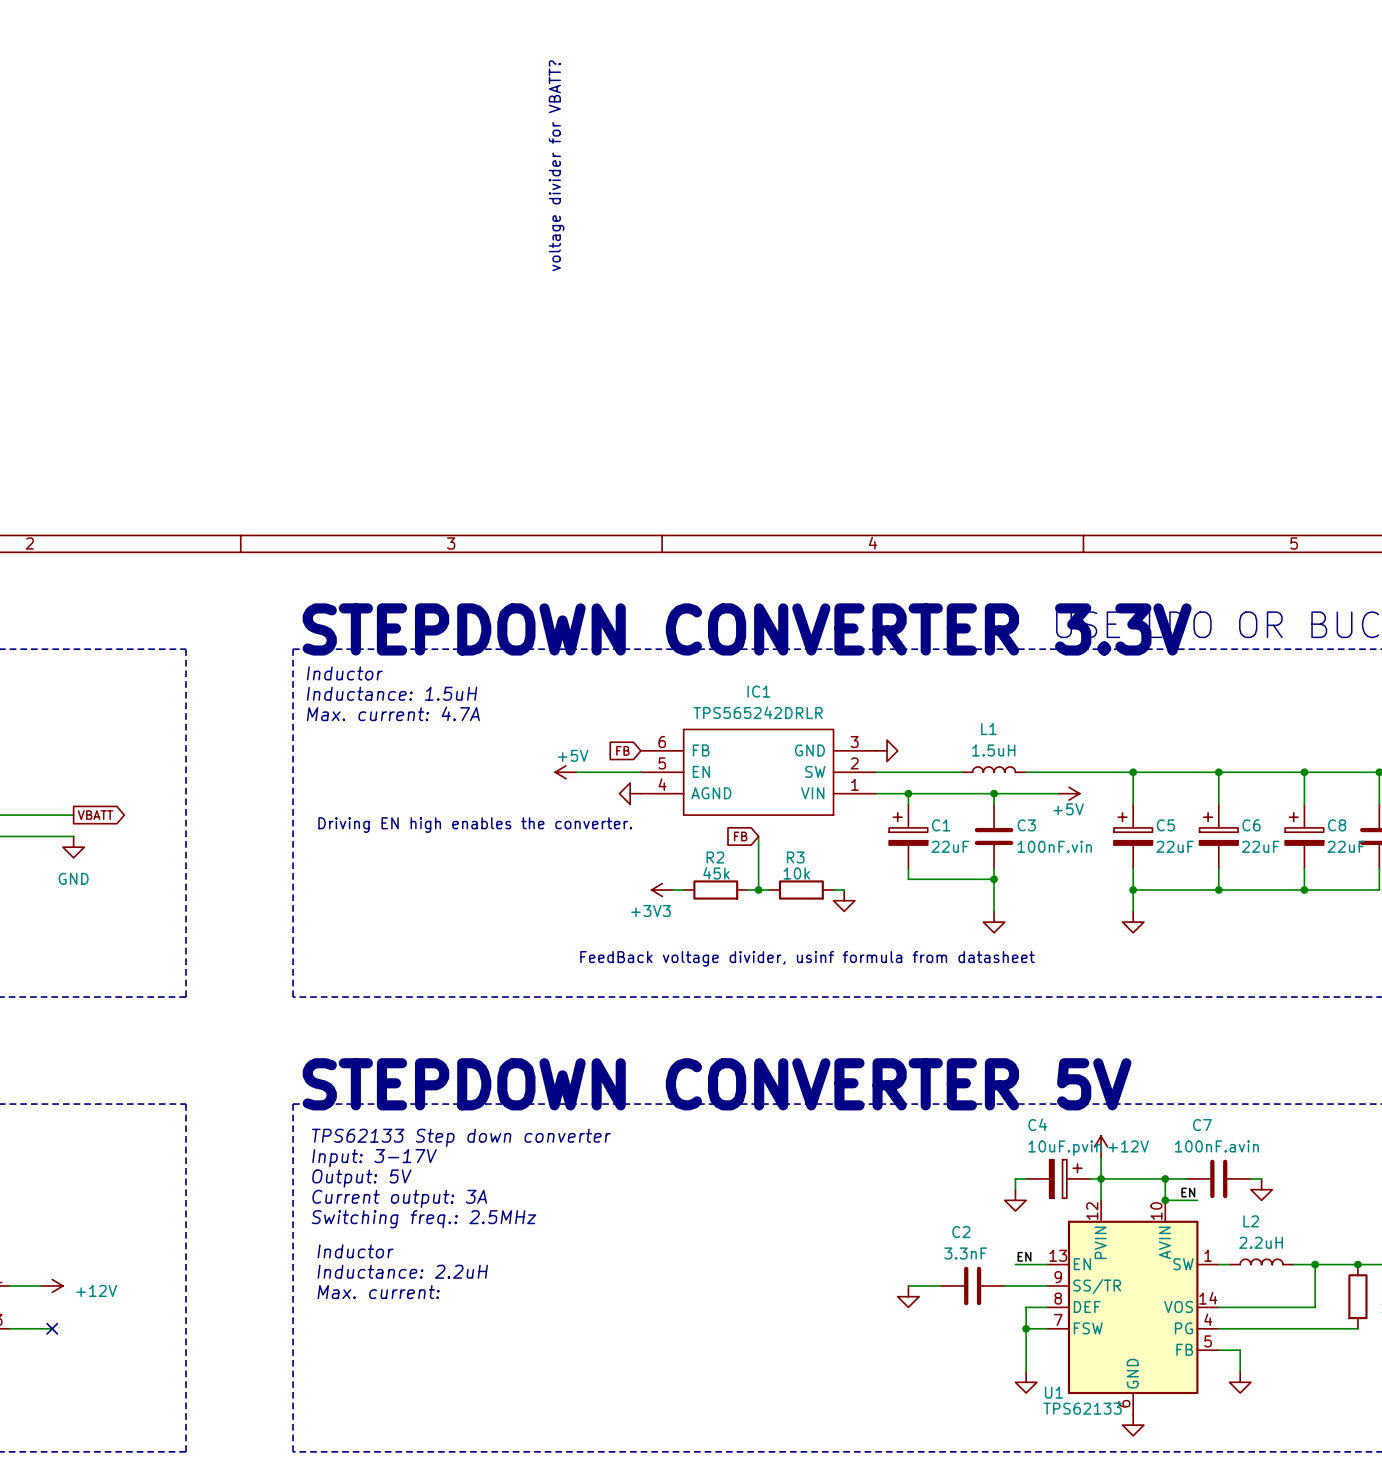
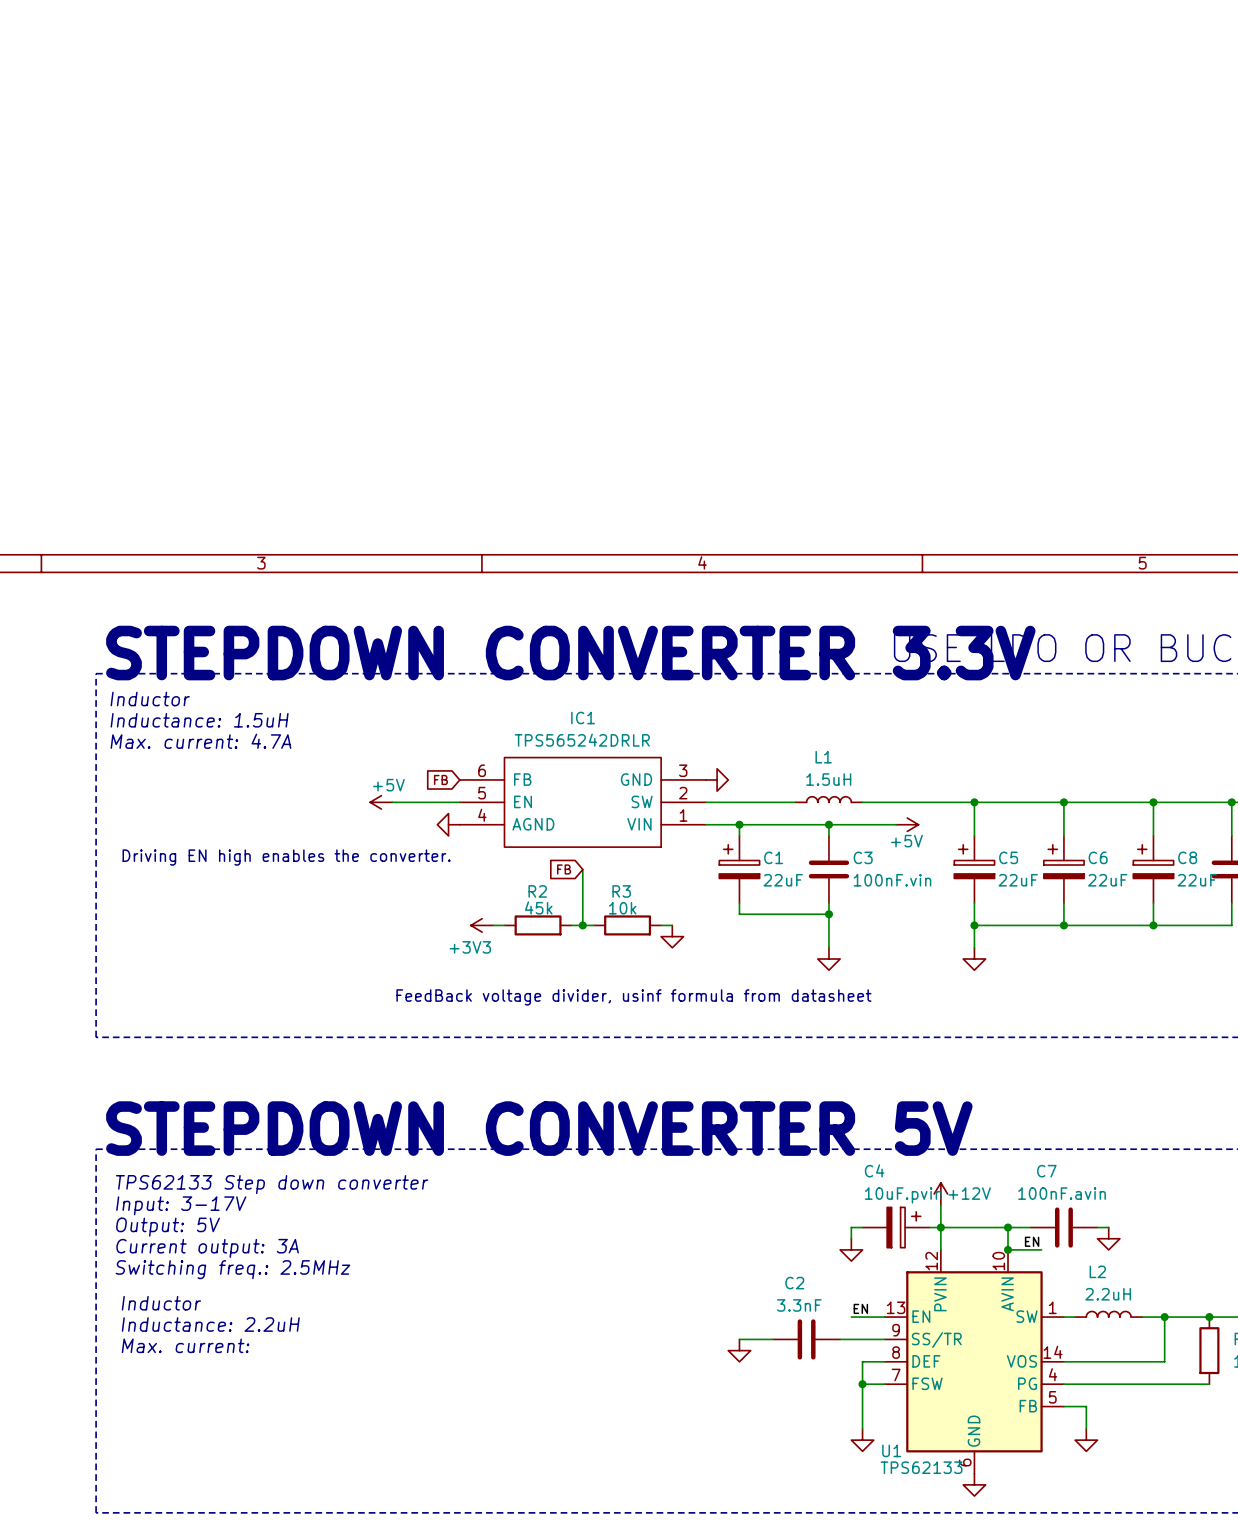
text: voltage divider for VBATT? (556, 165) -> none

